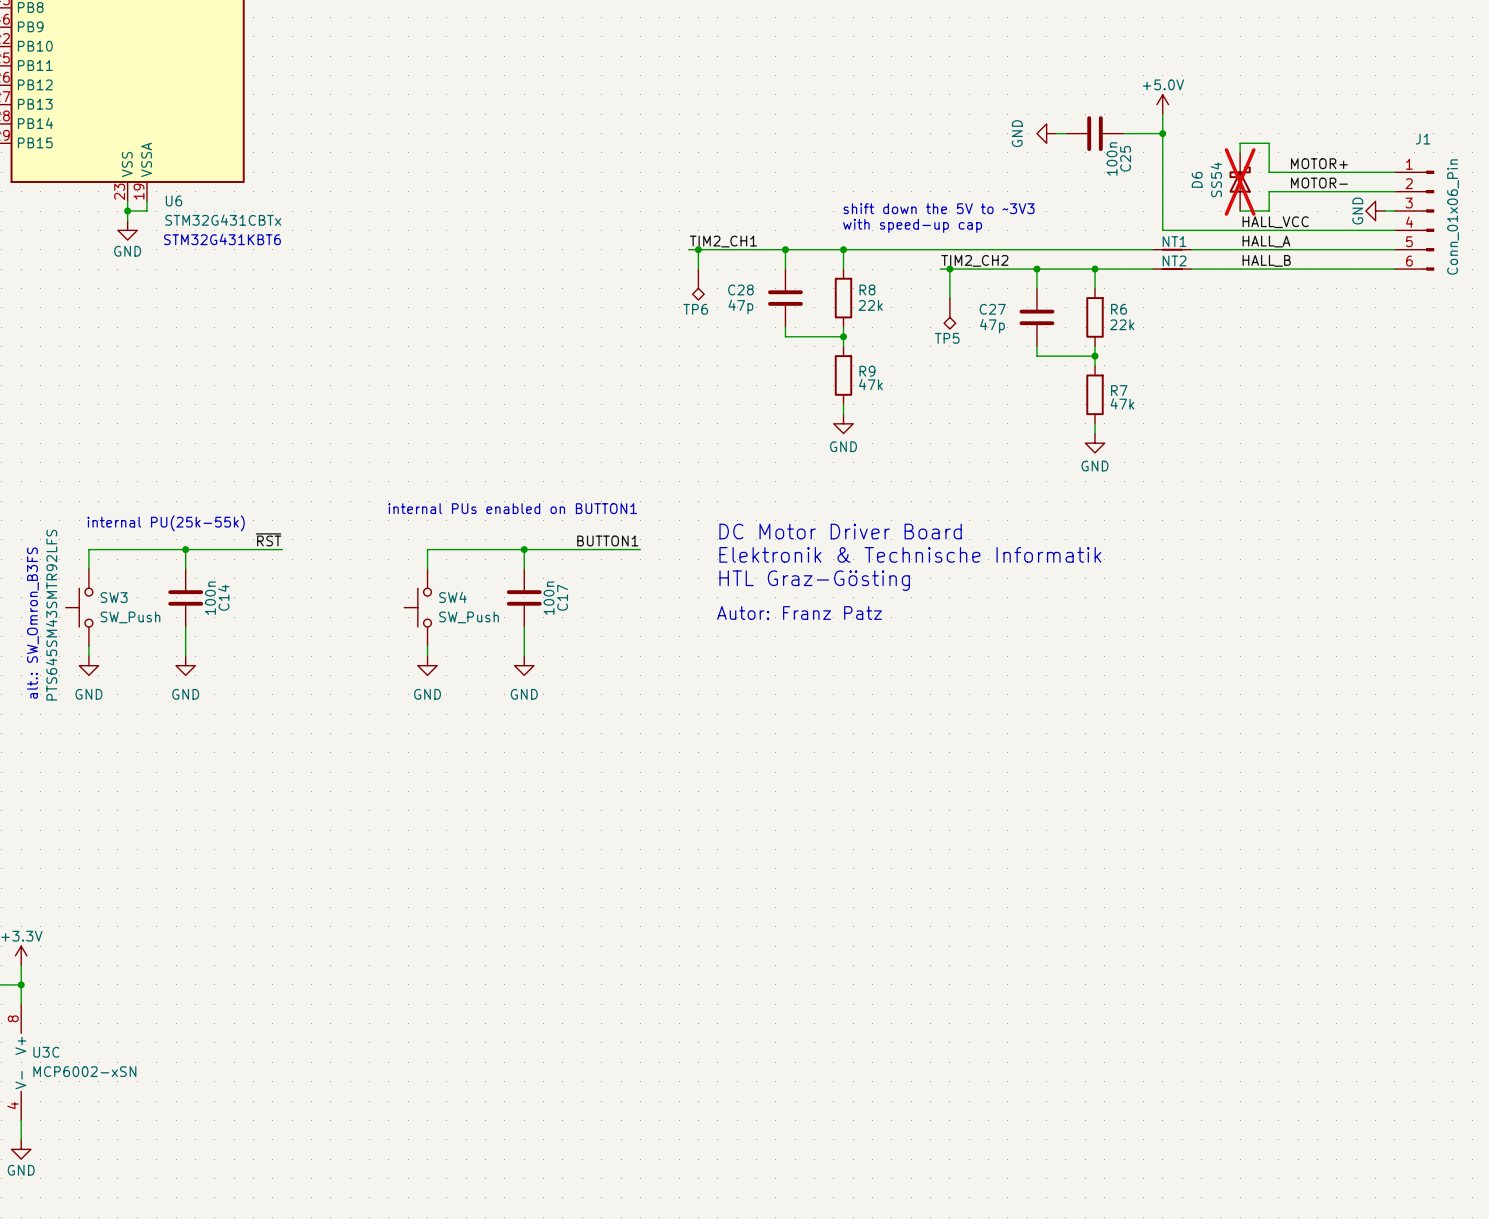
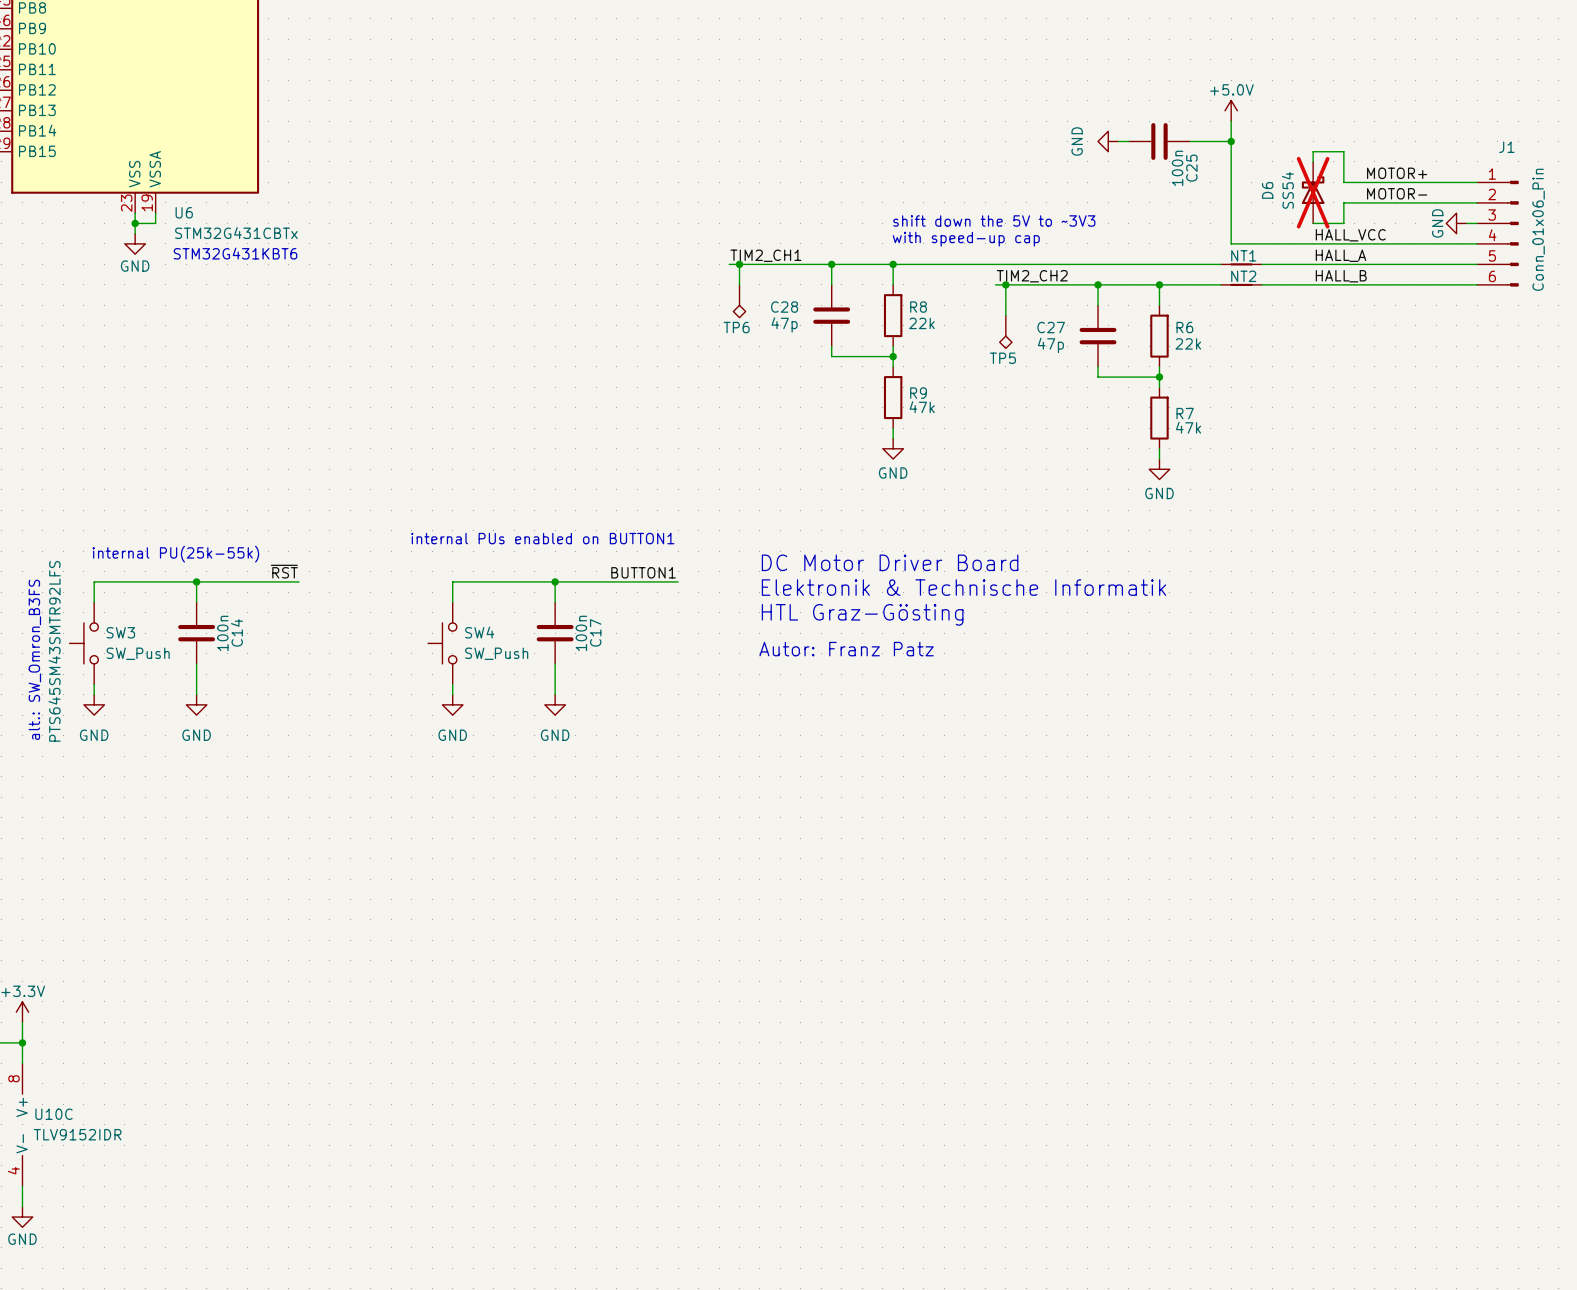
U3C name: U3C (46, 1052) -> U10C (54, 1114)
U3C value: MCP6002-xSN (84, 1071) -> TLV9152IDR (77, 1134)

